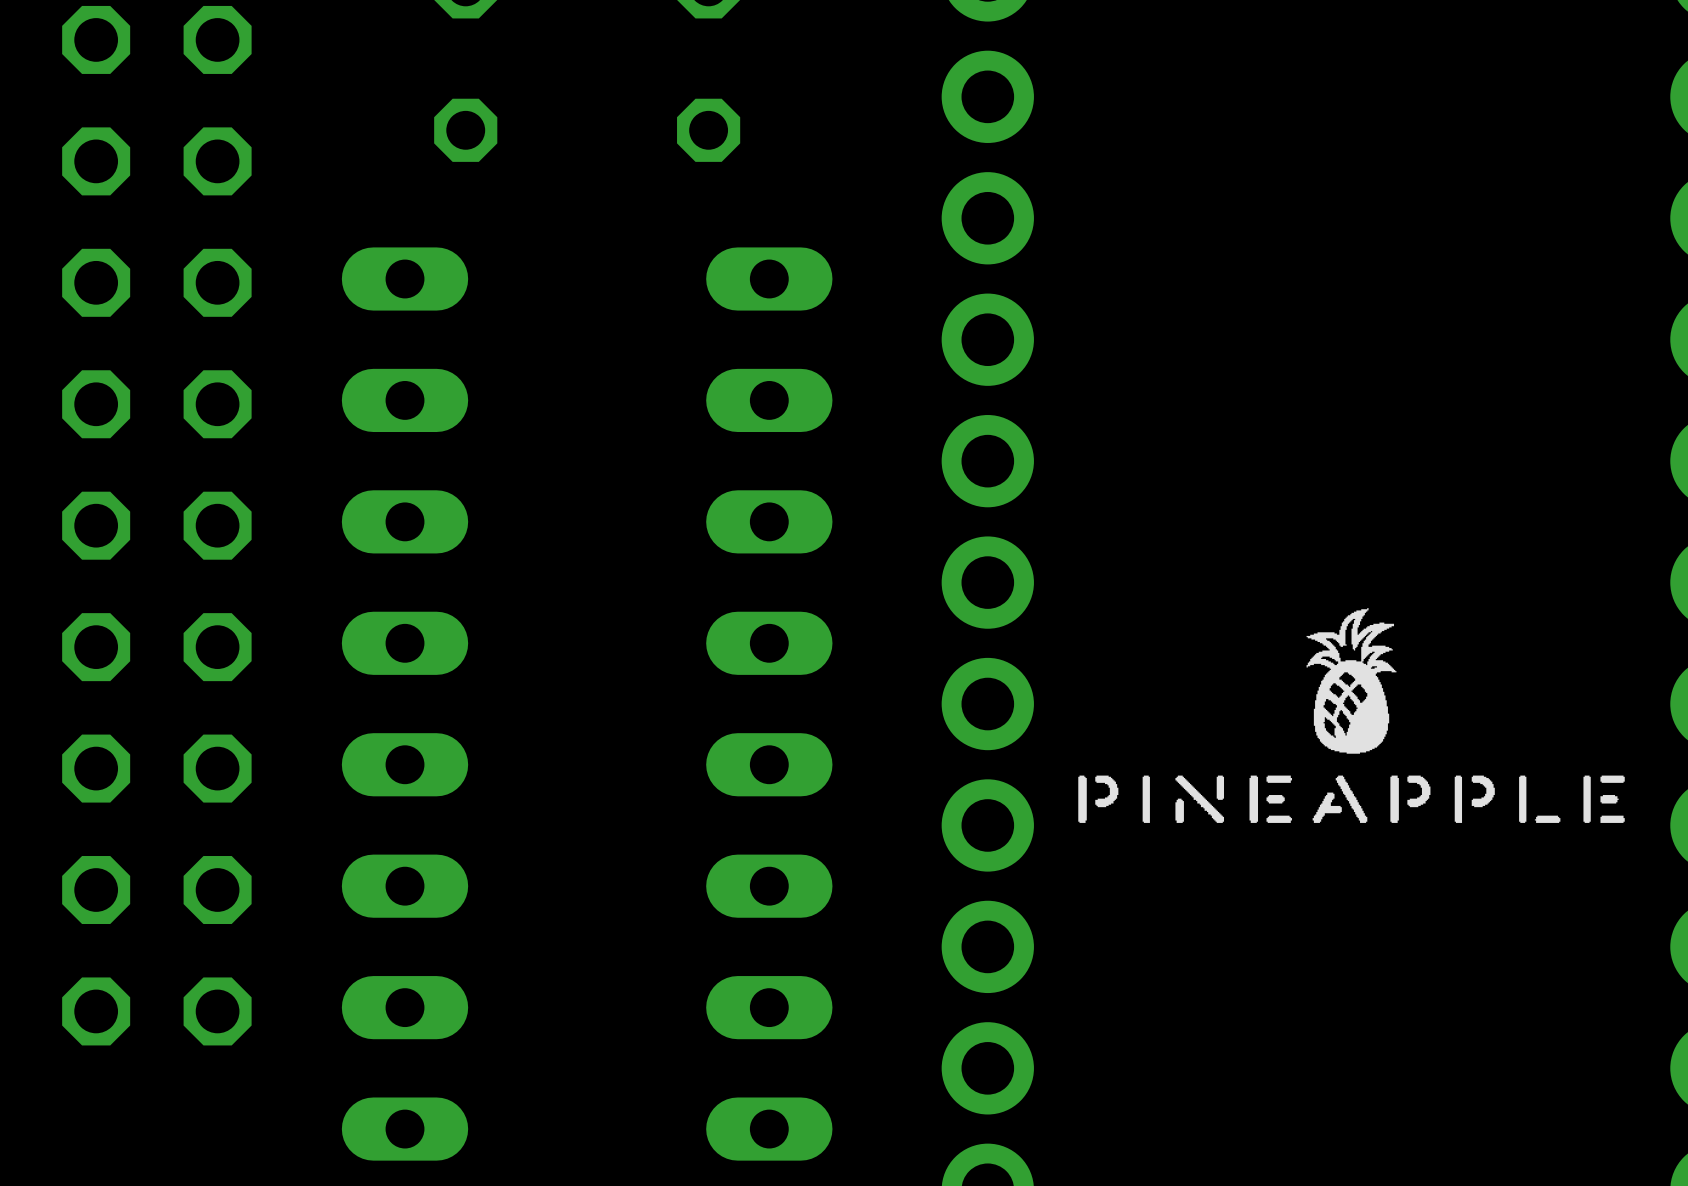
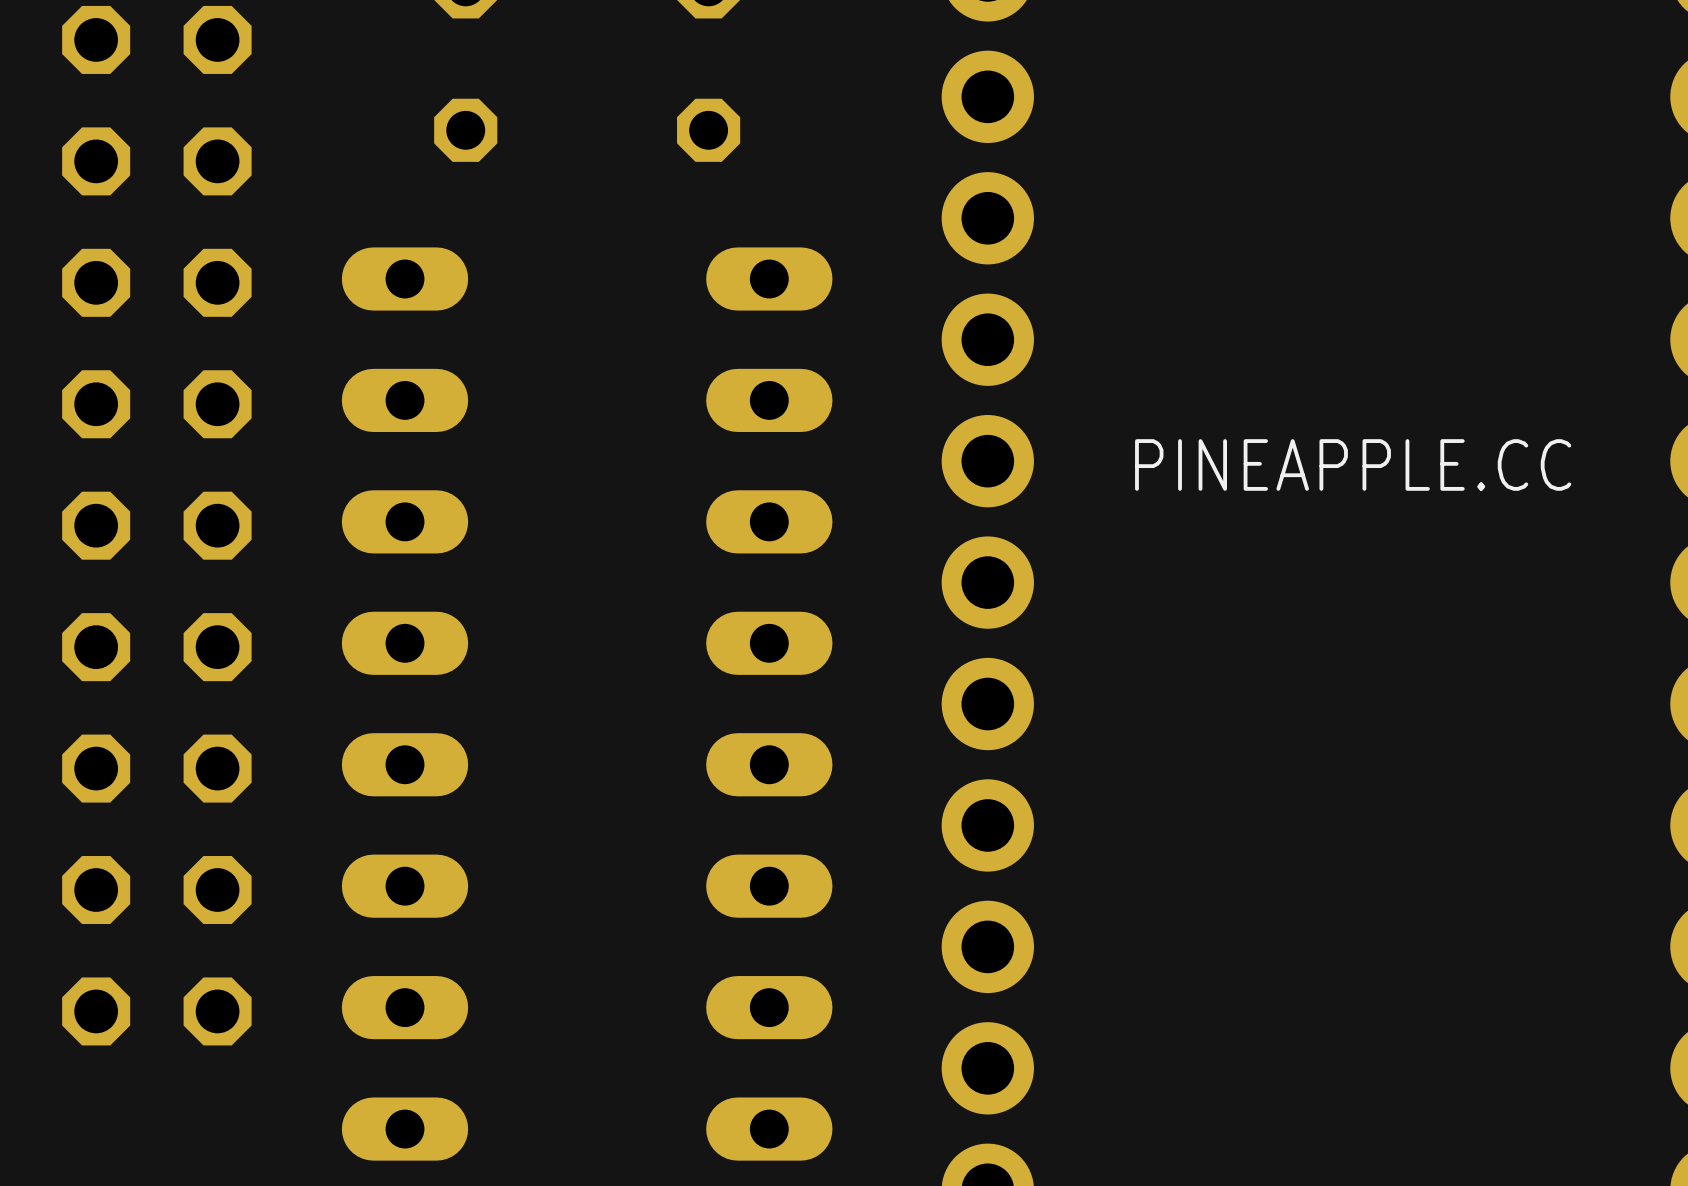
text: none -> PINEAPPLE.CC (1353, 464)
drawing: [1078, 608, 1625, 823] -> none

